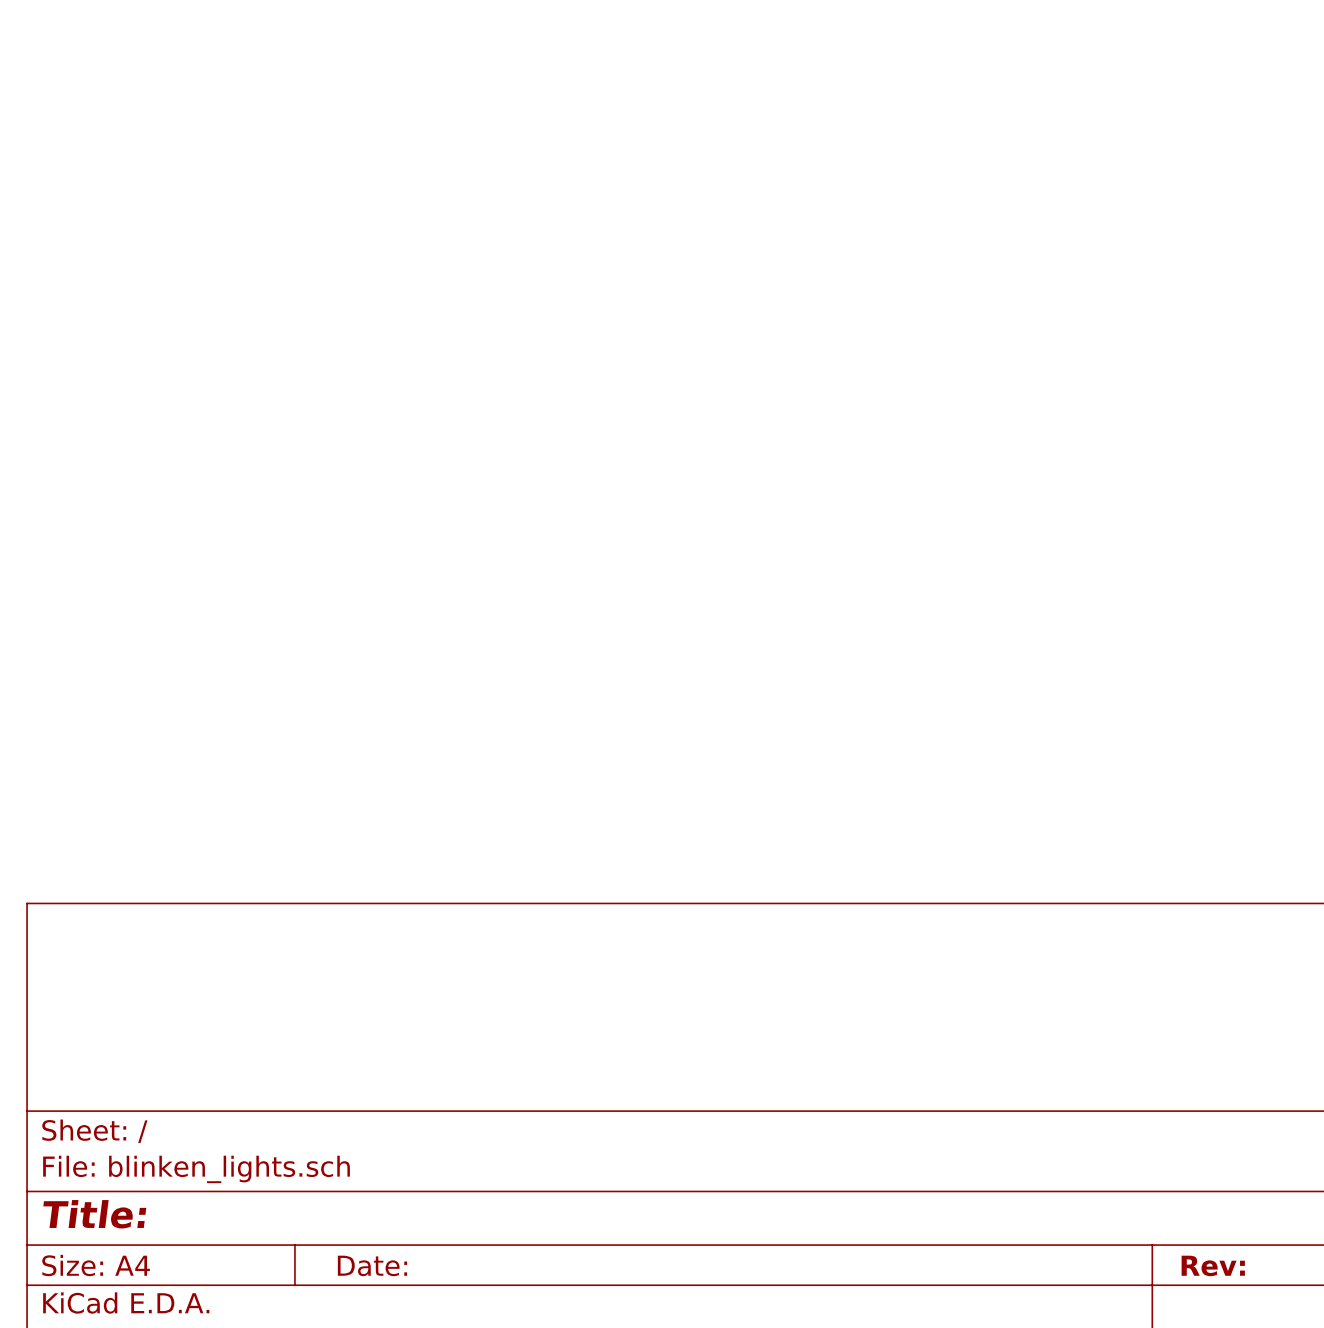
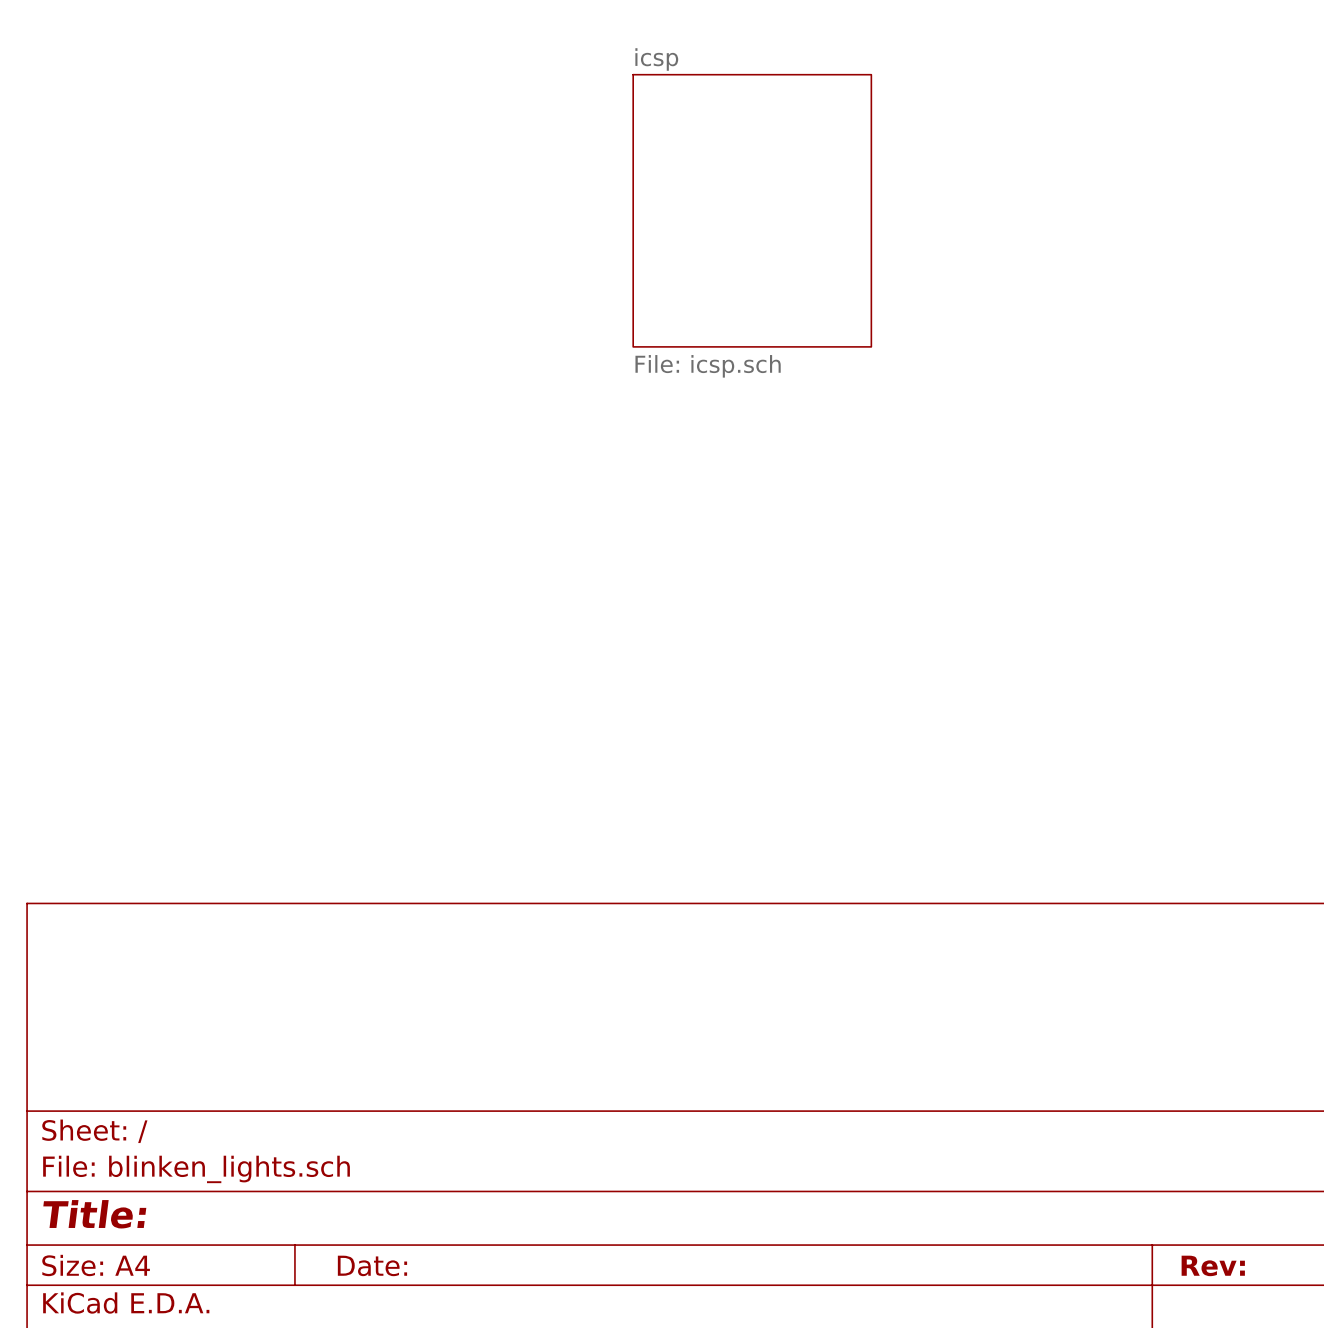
sheet icsp: none -> File: icsp.sch (752, 210)

